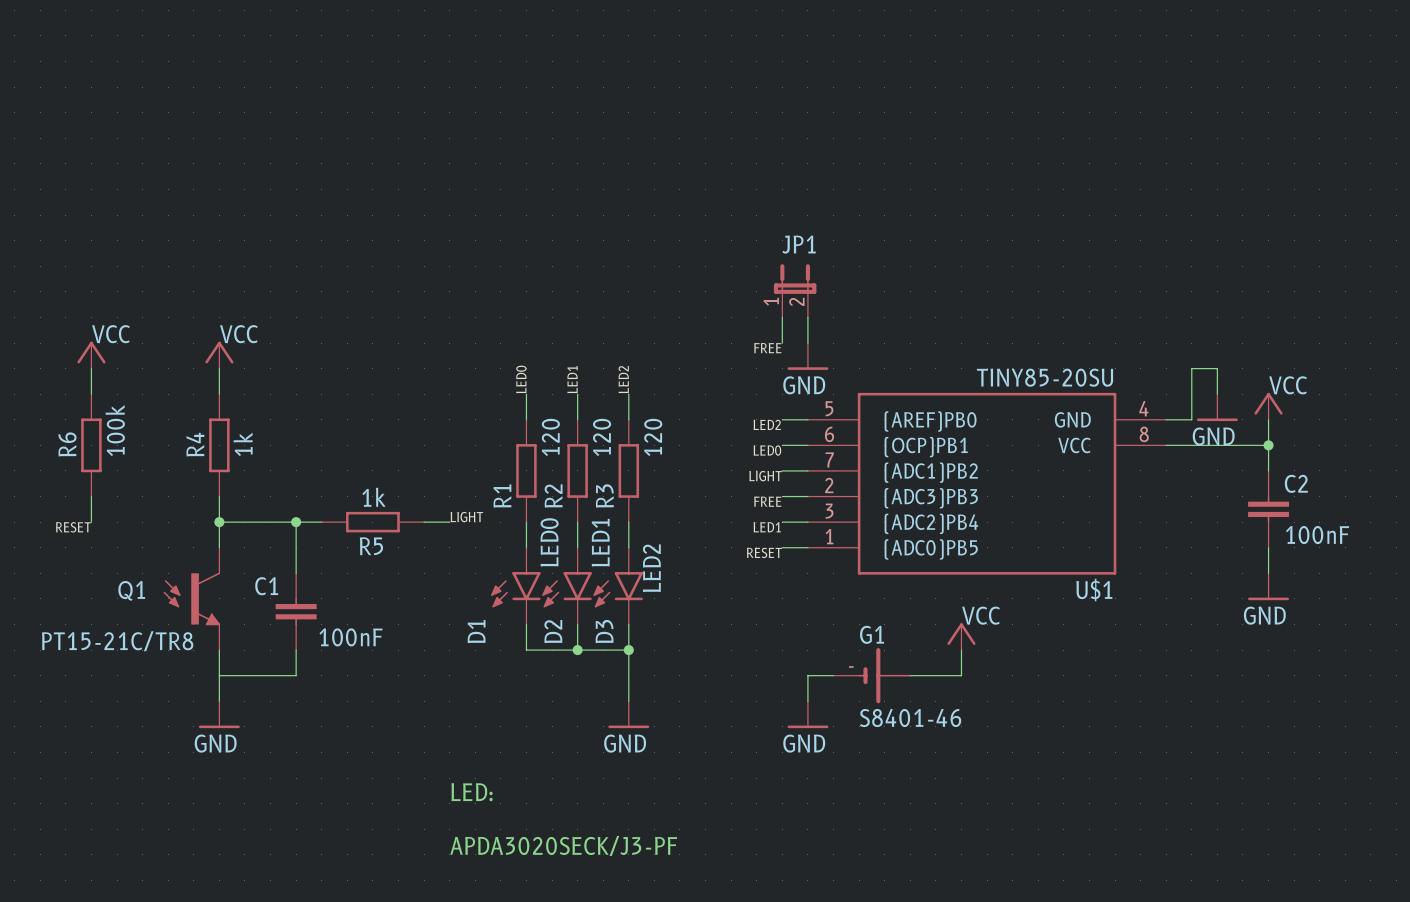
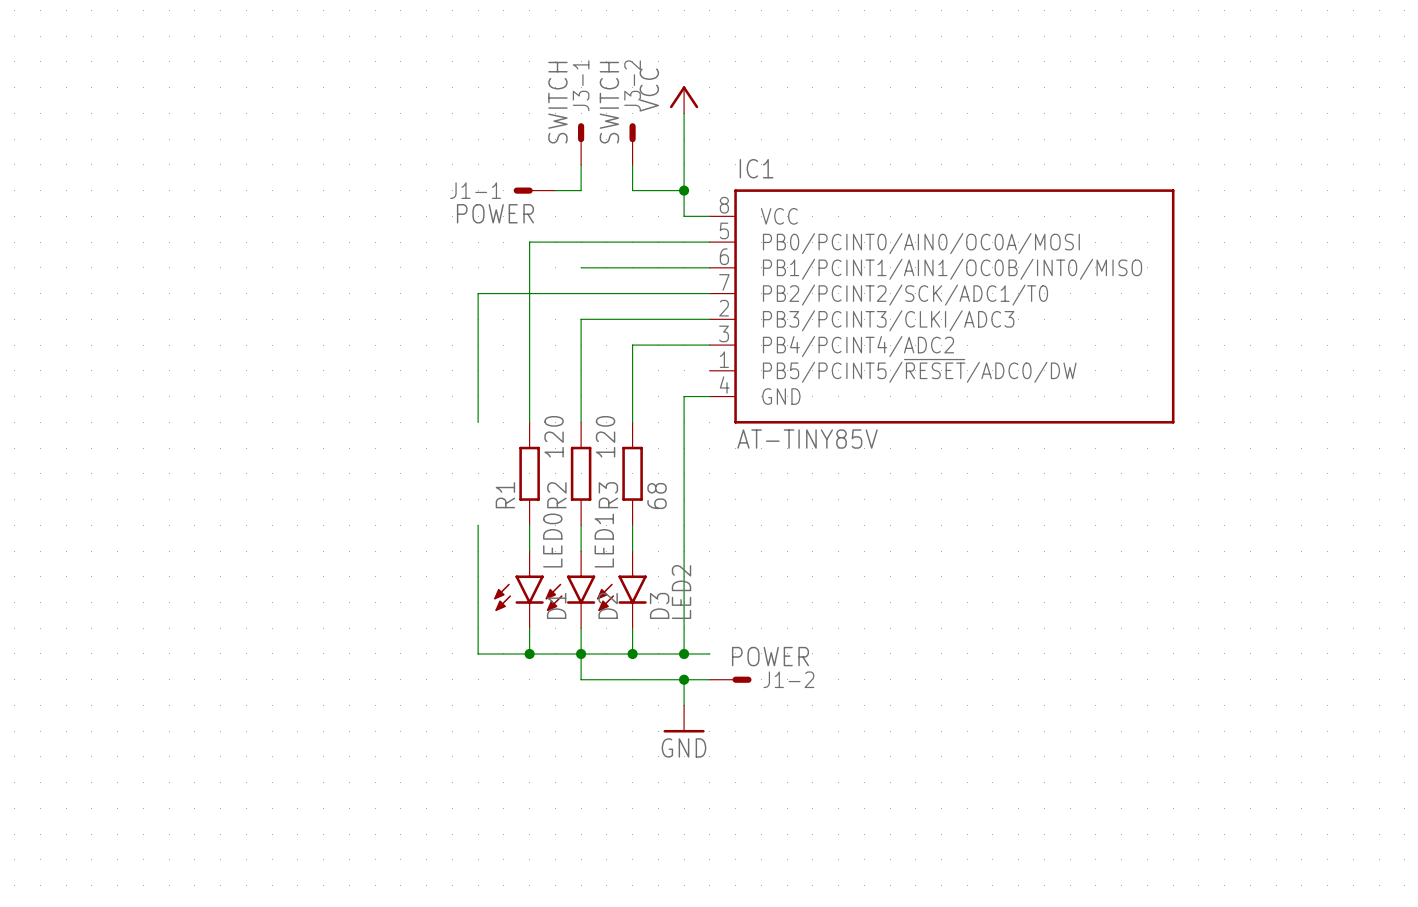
power symbol: none -> VCC (684, 99)
wire: none -> (684, 113) (684, 216) (709, 216)
J3-1: none -> SWITCH (581, 144)
J3-2: none -> SWITCH (632, 144)
wire: none -> (581, 164) (581, 190) (555, 190)
wire: none -> (632, 164) (632, 190) (684, 190)
J1-1: none -> POWER (534, 190)
junction: none -> (684, 190)
wire: none -> (709, 242) (529, 242) (529, 396)
wire: none -> (581, 267) (709, 267)
JP1: (795, 290) -> none
wire: none -> (709, 293) (478, 293) (478, 422)
IC1: none -> AT-TINY85V (942, 306)
wire: none -> (709, 319) (581, 319) (581, 396)
wire: (782, 317) (782, 343) -> none
wire: (807, 317) (807, 343) -> none
wire: none -> (709, 345) (632, 345) (632, 396)
label: FREE (767, 348) -> none
power symbol: VCC (91, 355) -> none
power symbol: VCC (219, 355) -> none
power symbol: GND (807, 356) -> none
wire: (91, 368) (91, 394) -> none
wire: (219, 368) (219, 394) -> none
label: LED0 (521, 379) -> none
label: LED1 (572, 379) -> none
label: LED2 (623, 379) -> none
wire: none -> (709, 396) (684, 396) (684, 653)
wire: (1217, 394) (1217, 368) (1191, 368) (1191, 419) (1166, 419) -> none
power symbol: VCC (1268, 406) -> none
power symbol: GND (1217, 407) -> none
wire: (1268, 419) (1268, 470) -> none
label: LED2 (767, 424) -> none
R3 value: 120 (653, 437) -> 68 (657, 496)
R6: 100k (91, 445) -> none
R4: 1k (219, 445) -> none
wire: (782, 445) (807, 445) -> none
wire: (1166, 445) (1268, 445) -> none
junction: (1268, 445) -> none
label: LED0 (767, 450) -> none
wire: (782, 470) (807, 470) -> none
label: LIGHT (765, 476) -> none
U$1: TINY85-20SU (987, 483) -> none
wire: (91, 496) (91, 522) -> none
wire: (219, 496) (219, 547) -> none
wire: (782, 496) (807, 496) -> none
label: FREE (767, 501) -> none
C2: 100nF (1268, 509) -> none
label: LIGHT (466, 517) -> none
wire: (219, 522) (321, 522) -> none
junction: (219, 522) -> none
wire: (296, 522) (296, 573) -> none
junction: (296, 522) -> none
R5: 1k (372, 522) -> none
wire: (424, 522) (449, 522) -> none
wire: none -> (478, 525) (478, 653) (529, 653)
wire: (782, 522) (807, 522) -> none
label: RESET (73, 527) -> none
label: LED1 (767, 527) -> none
wire: (782, 547) (807, 547) -> none
wire: (1268, 547) (1268, 573) -> none
label: RESET (764, 552) -> none
D3 value position: LED2 (651, 568) -> LED2 (681, 592)
power symbol: GND (1268, 586) -> none
Q1: PT15-21C/TR8 (191, 598) -> none
C1: 100nF (296, 611) -> none
D1 name position: D1 (476, 631) -> D1 (556, 605)
D2 name position: D2 (553, 631) -> D2 (608, 605)
D3 name position: D3 (604, 631) -> D3 (659, 605)
power symbol: VCC (961, 636) -> none
wire: (219, 650) (219, 701) -> none
wire: (296, 650) (296, 675) (219, 675) -> none
junction: none -> (529, 653)
wire: none -> (581, 653) (581, 679) (709, 679)
wire: (628, 650) (628, 701) -> (632, 653) (709, 653)
junction: none -> (684, 653)
wire: (961, 650) (961, 675) (910, 675) -> none
wire: none -> (684, 679) (684, 705)
junction: none -> (684, 679)
J1-2: none -> POWER (730, 679)
wire: (833, 675) (807, 675) (807, 701) -> none
G1: S8401-46 (872, 675) -> none
power symbol: GND (219, 714) -> none
power symbol position: GND (628, 714) -> GND (684, 718)
power symbol: GND (807, 714) -> none
text: LED: (471, 792) -> none
text: APDA3020SECK/J3-PF (563, 845) -> none

